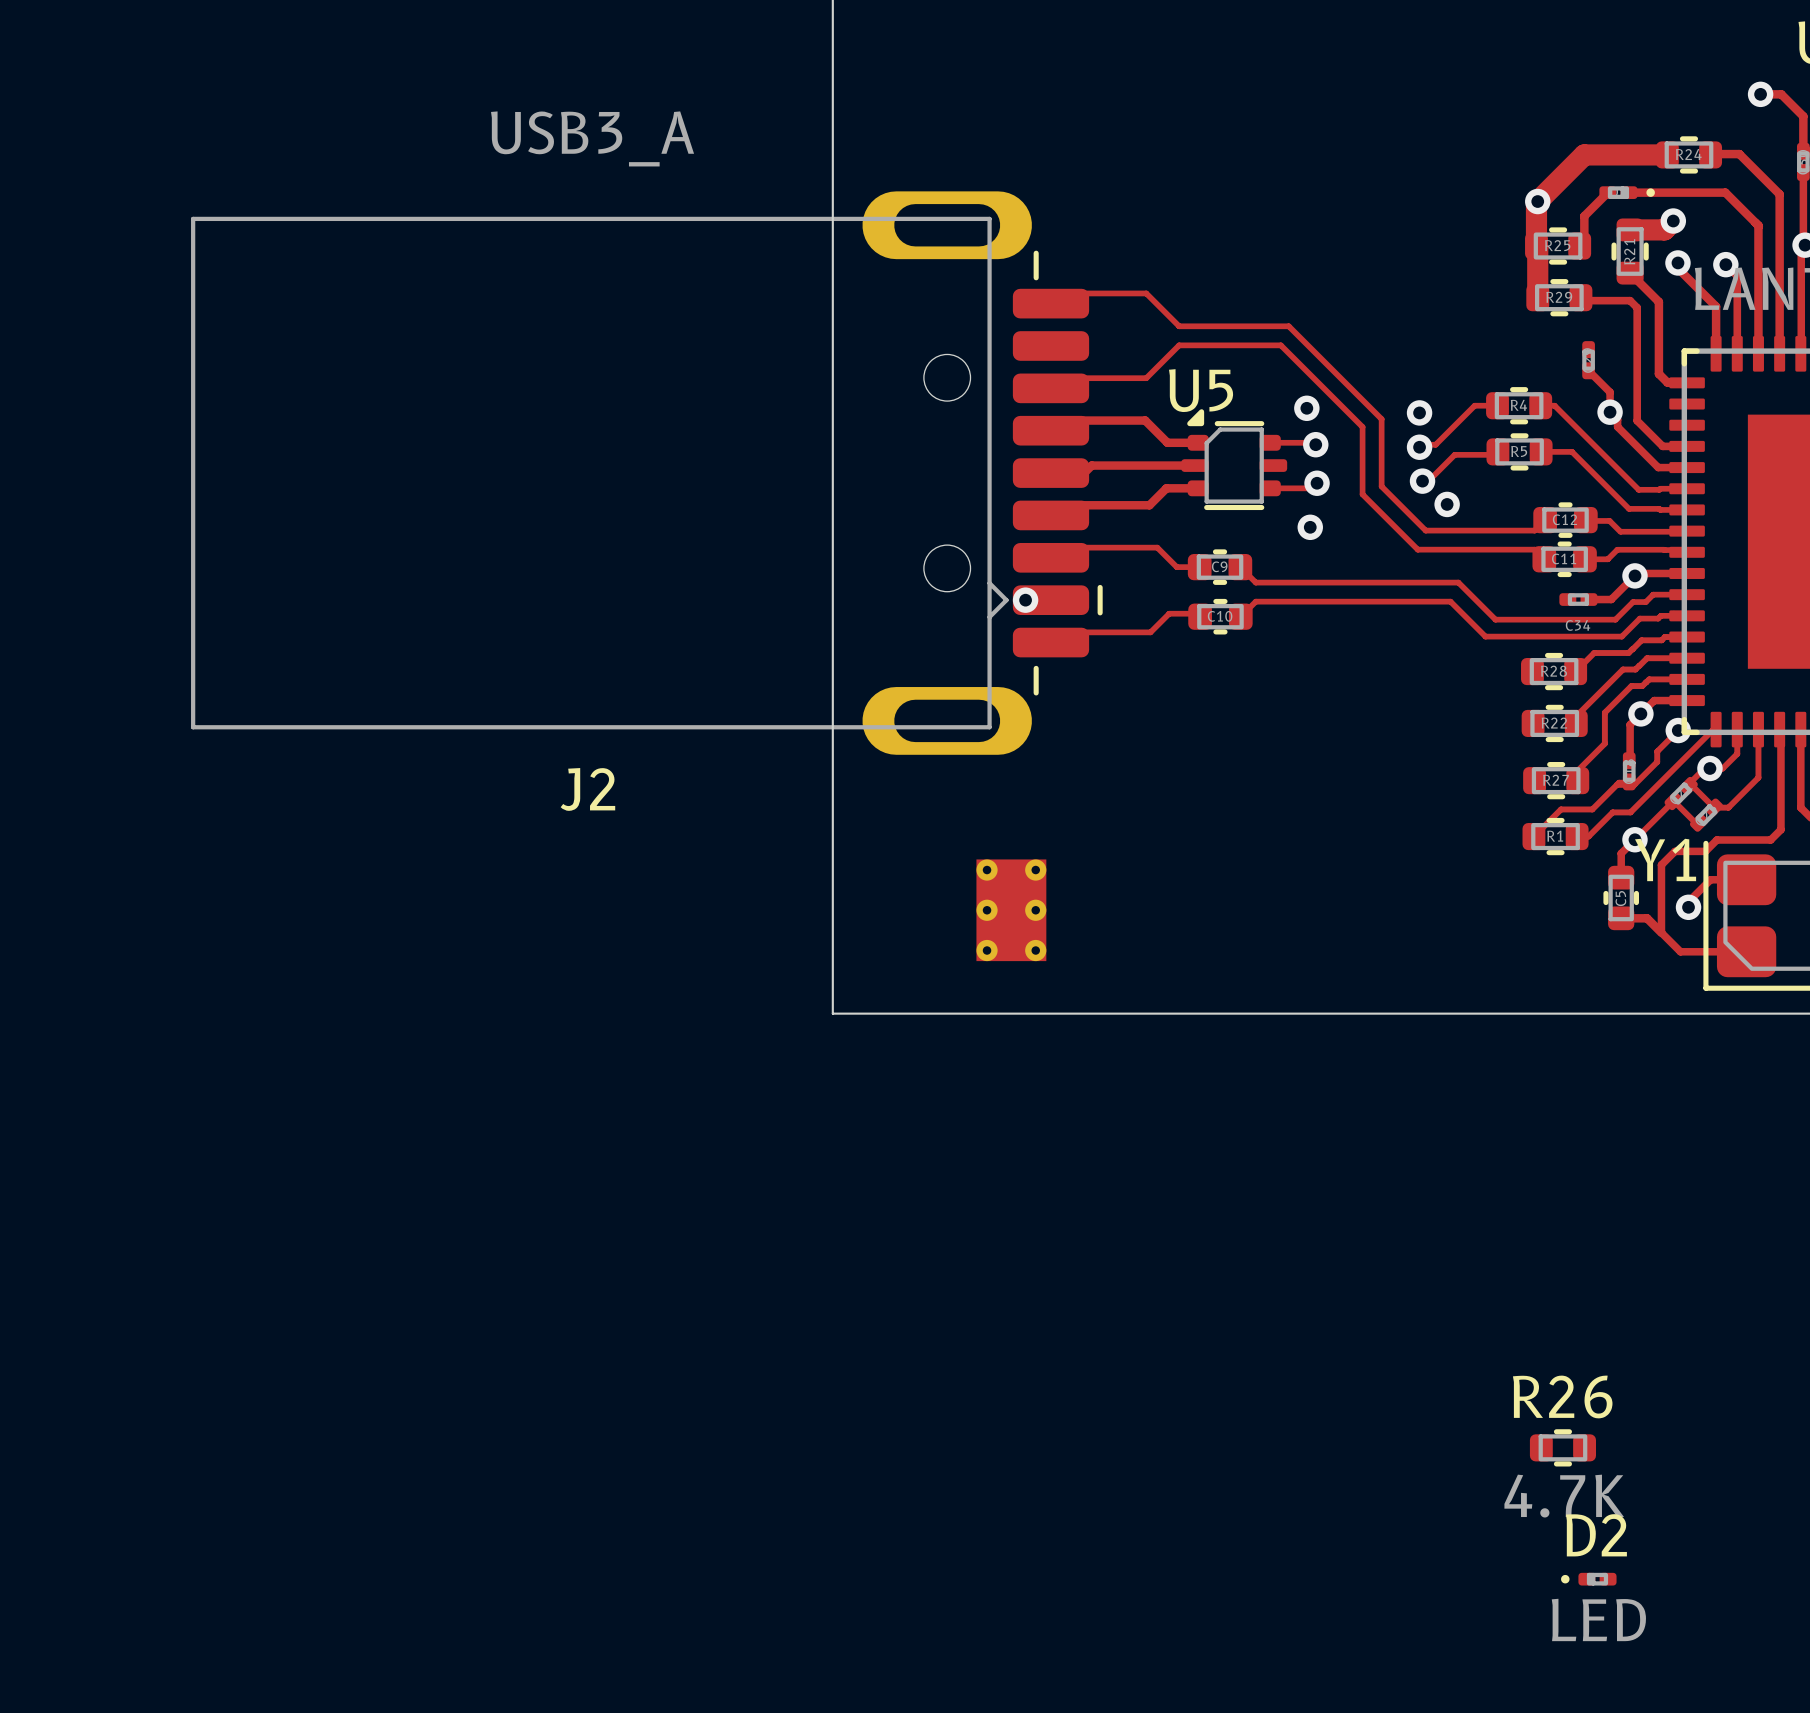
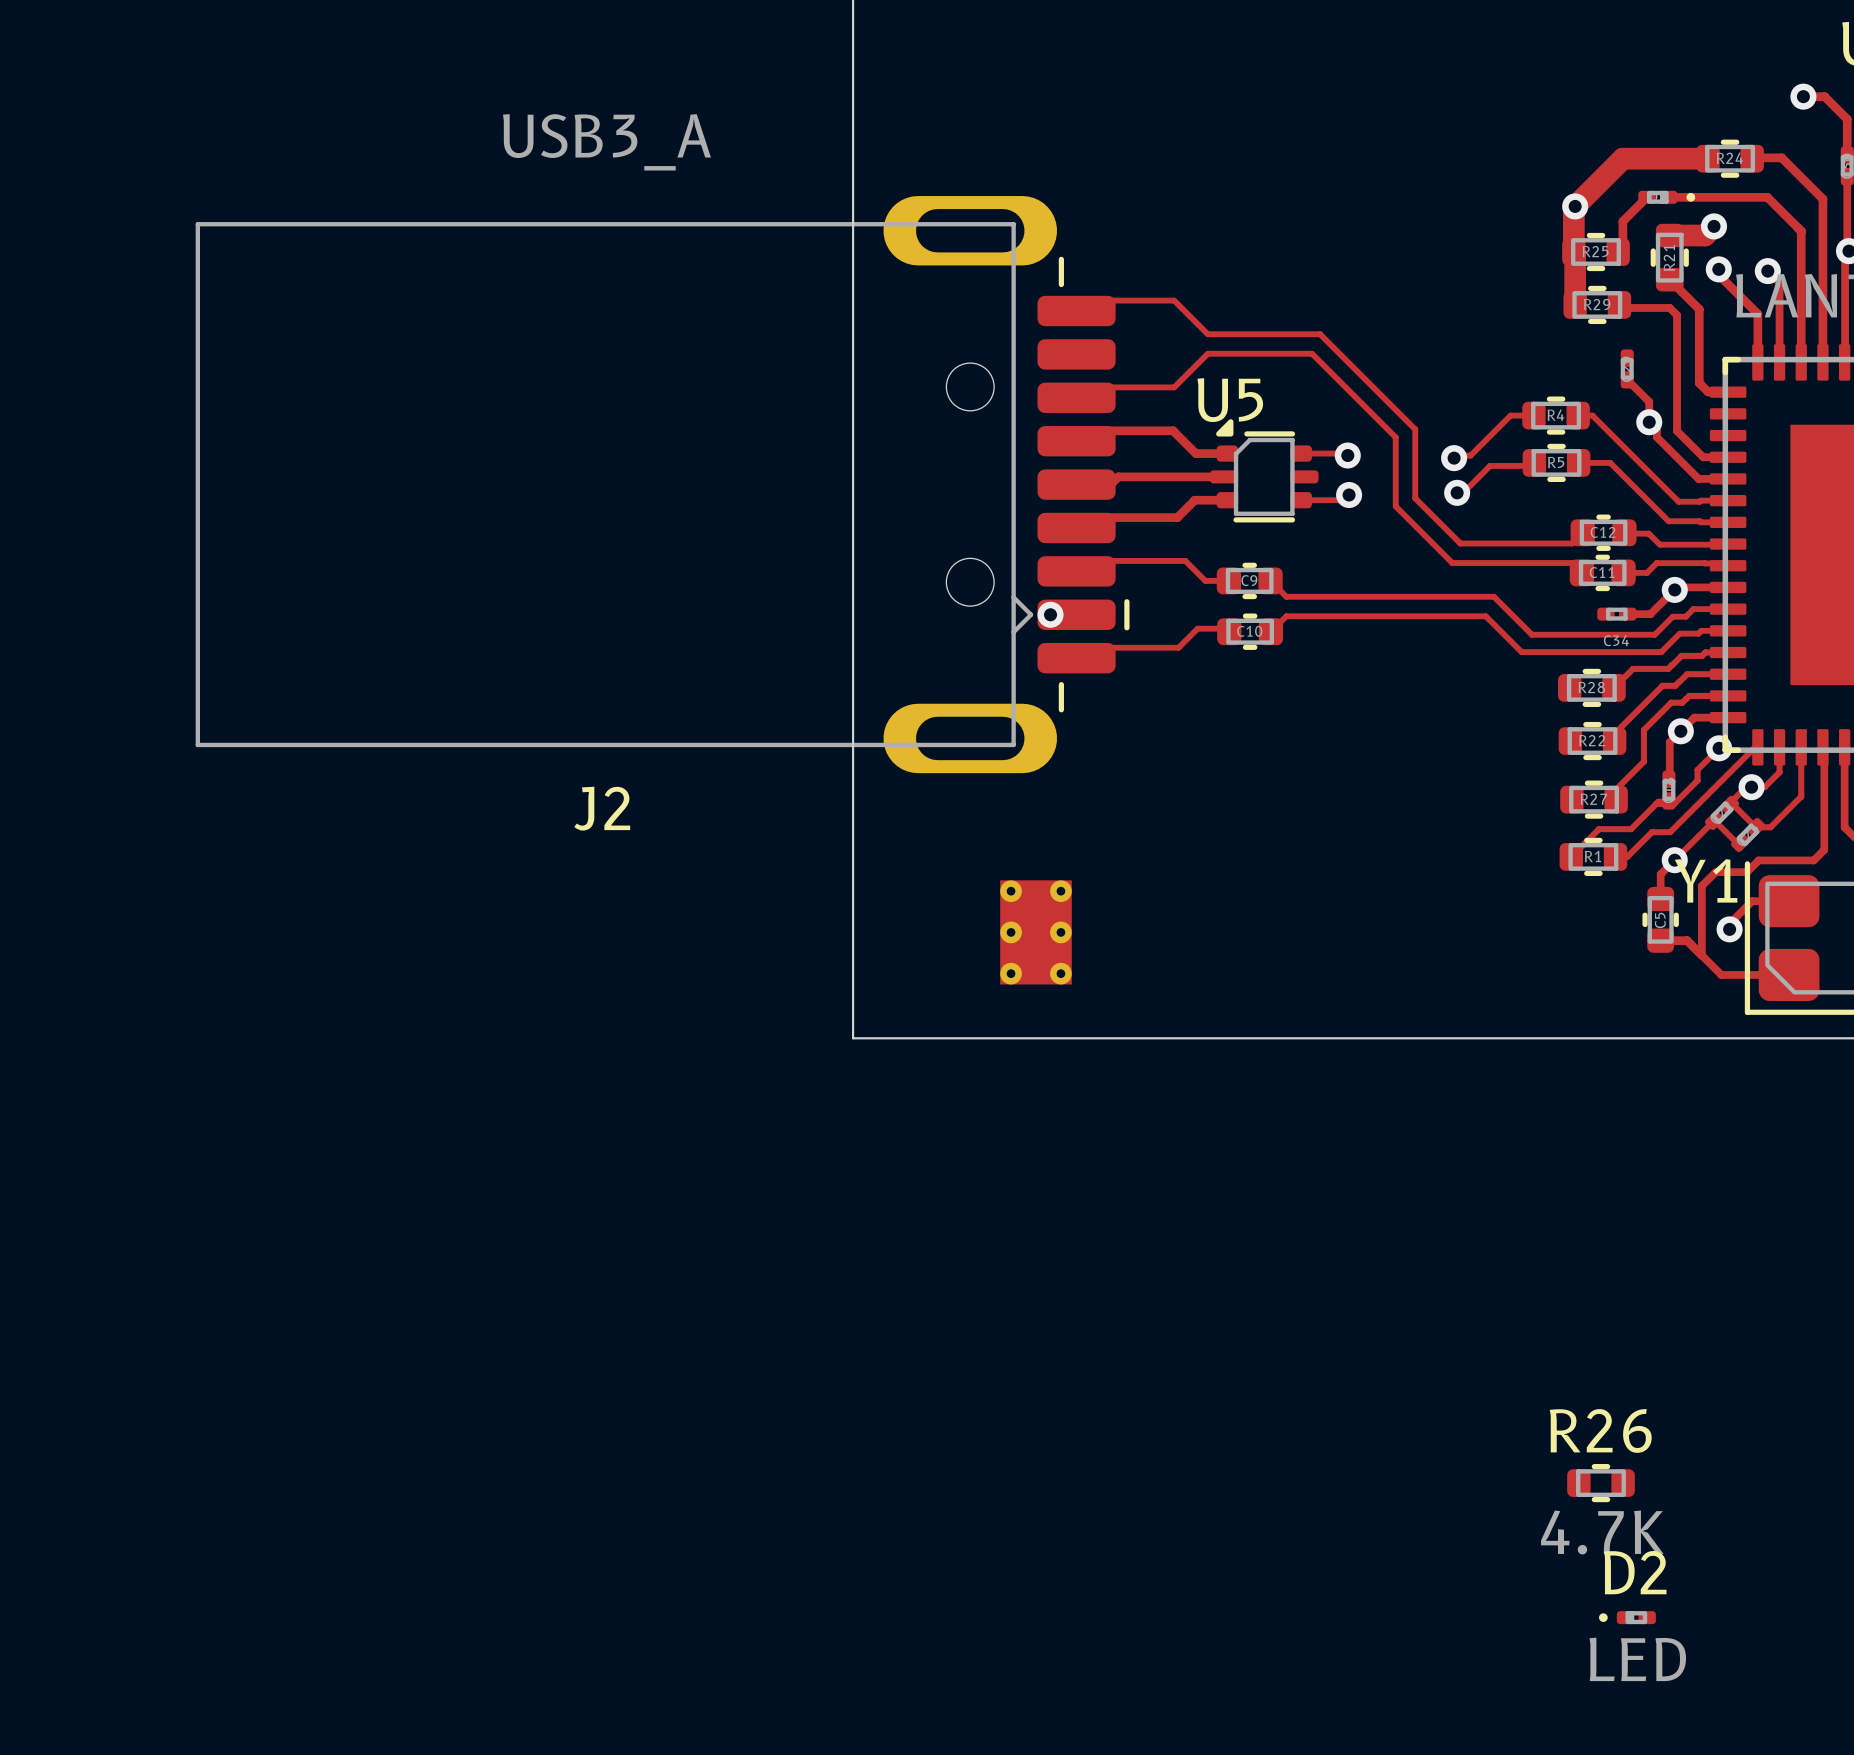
via: (1306, 408) -> none
via: (1419, 412) -> none
via: (1447, 504) -> none
via: (1310, 527) -> none

